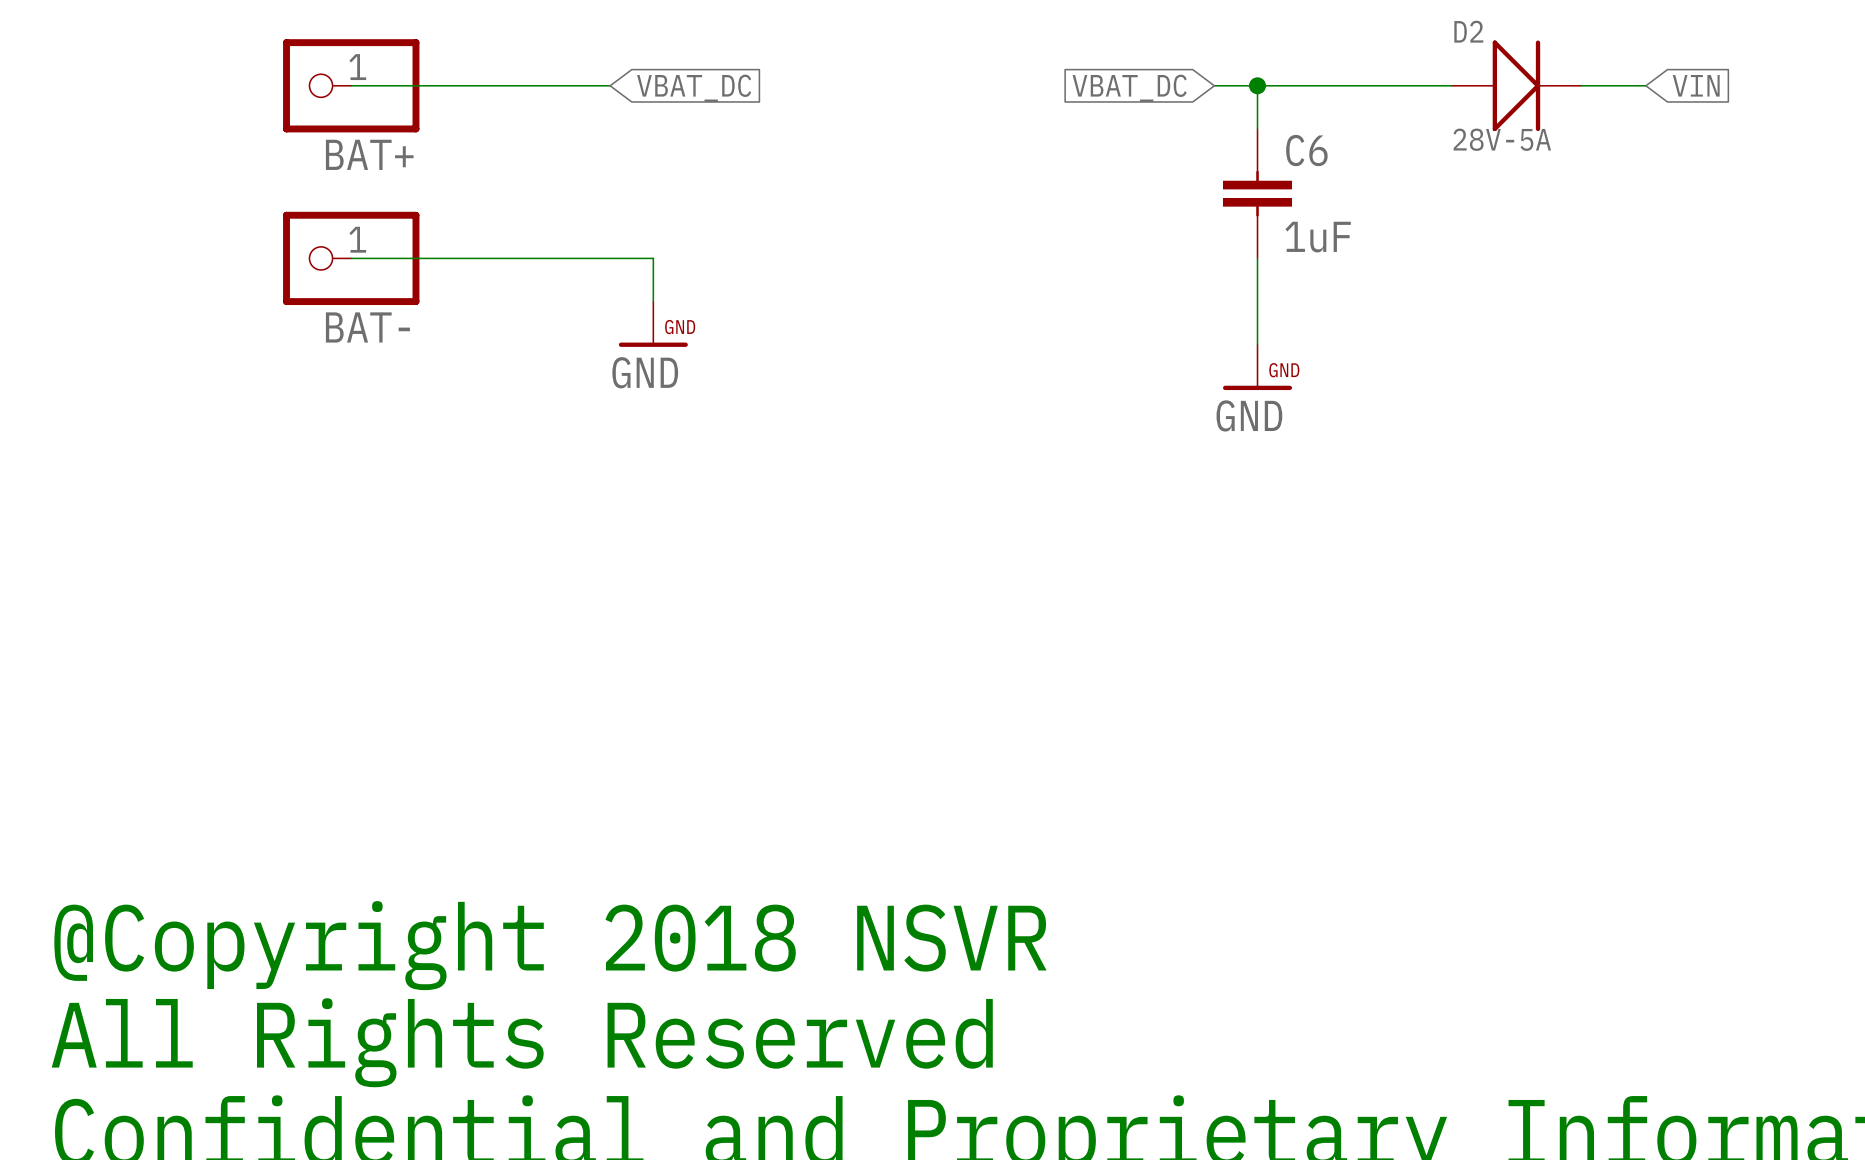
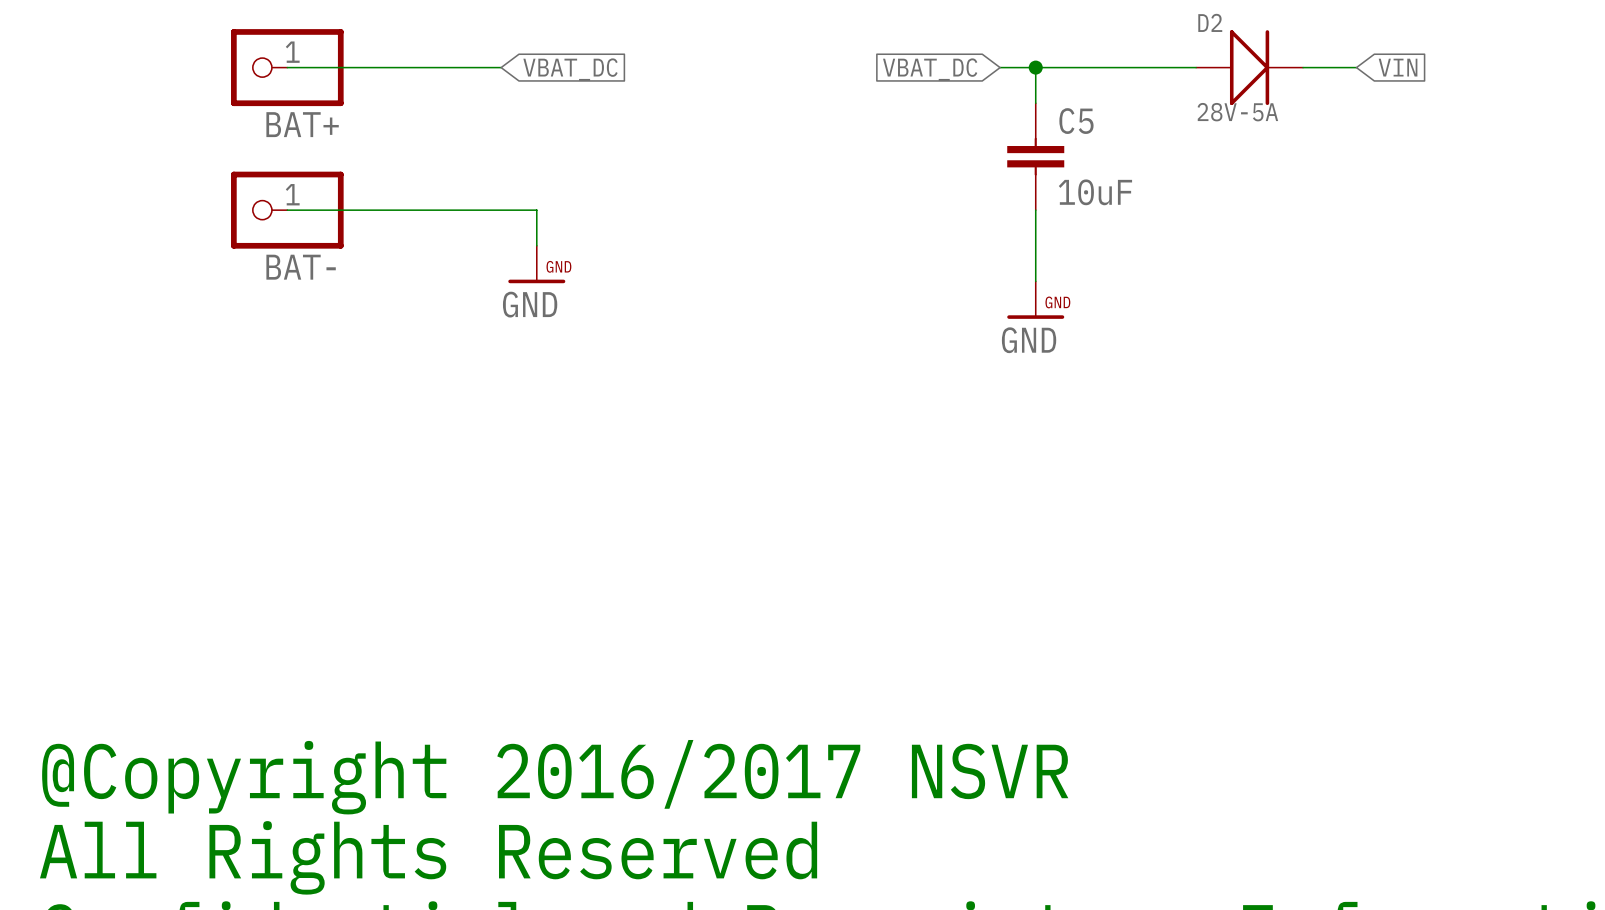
C6 name: C6 (1306, 150) -> C5 (1076, 121)
C6 value: 1uF (1318, 237) -> 10uF (1095, 192)
text: @Copyright 2018 NSVR (550, 945) -> @Copyright 2016/2017 NSVR (555, 777)

